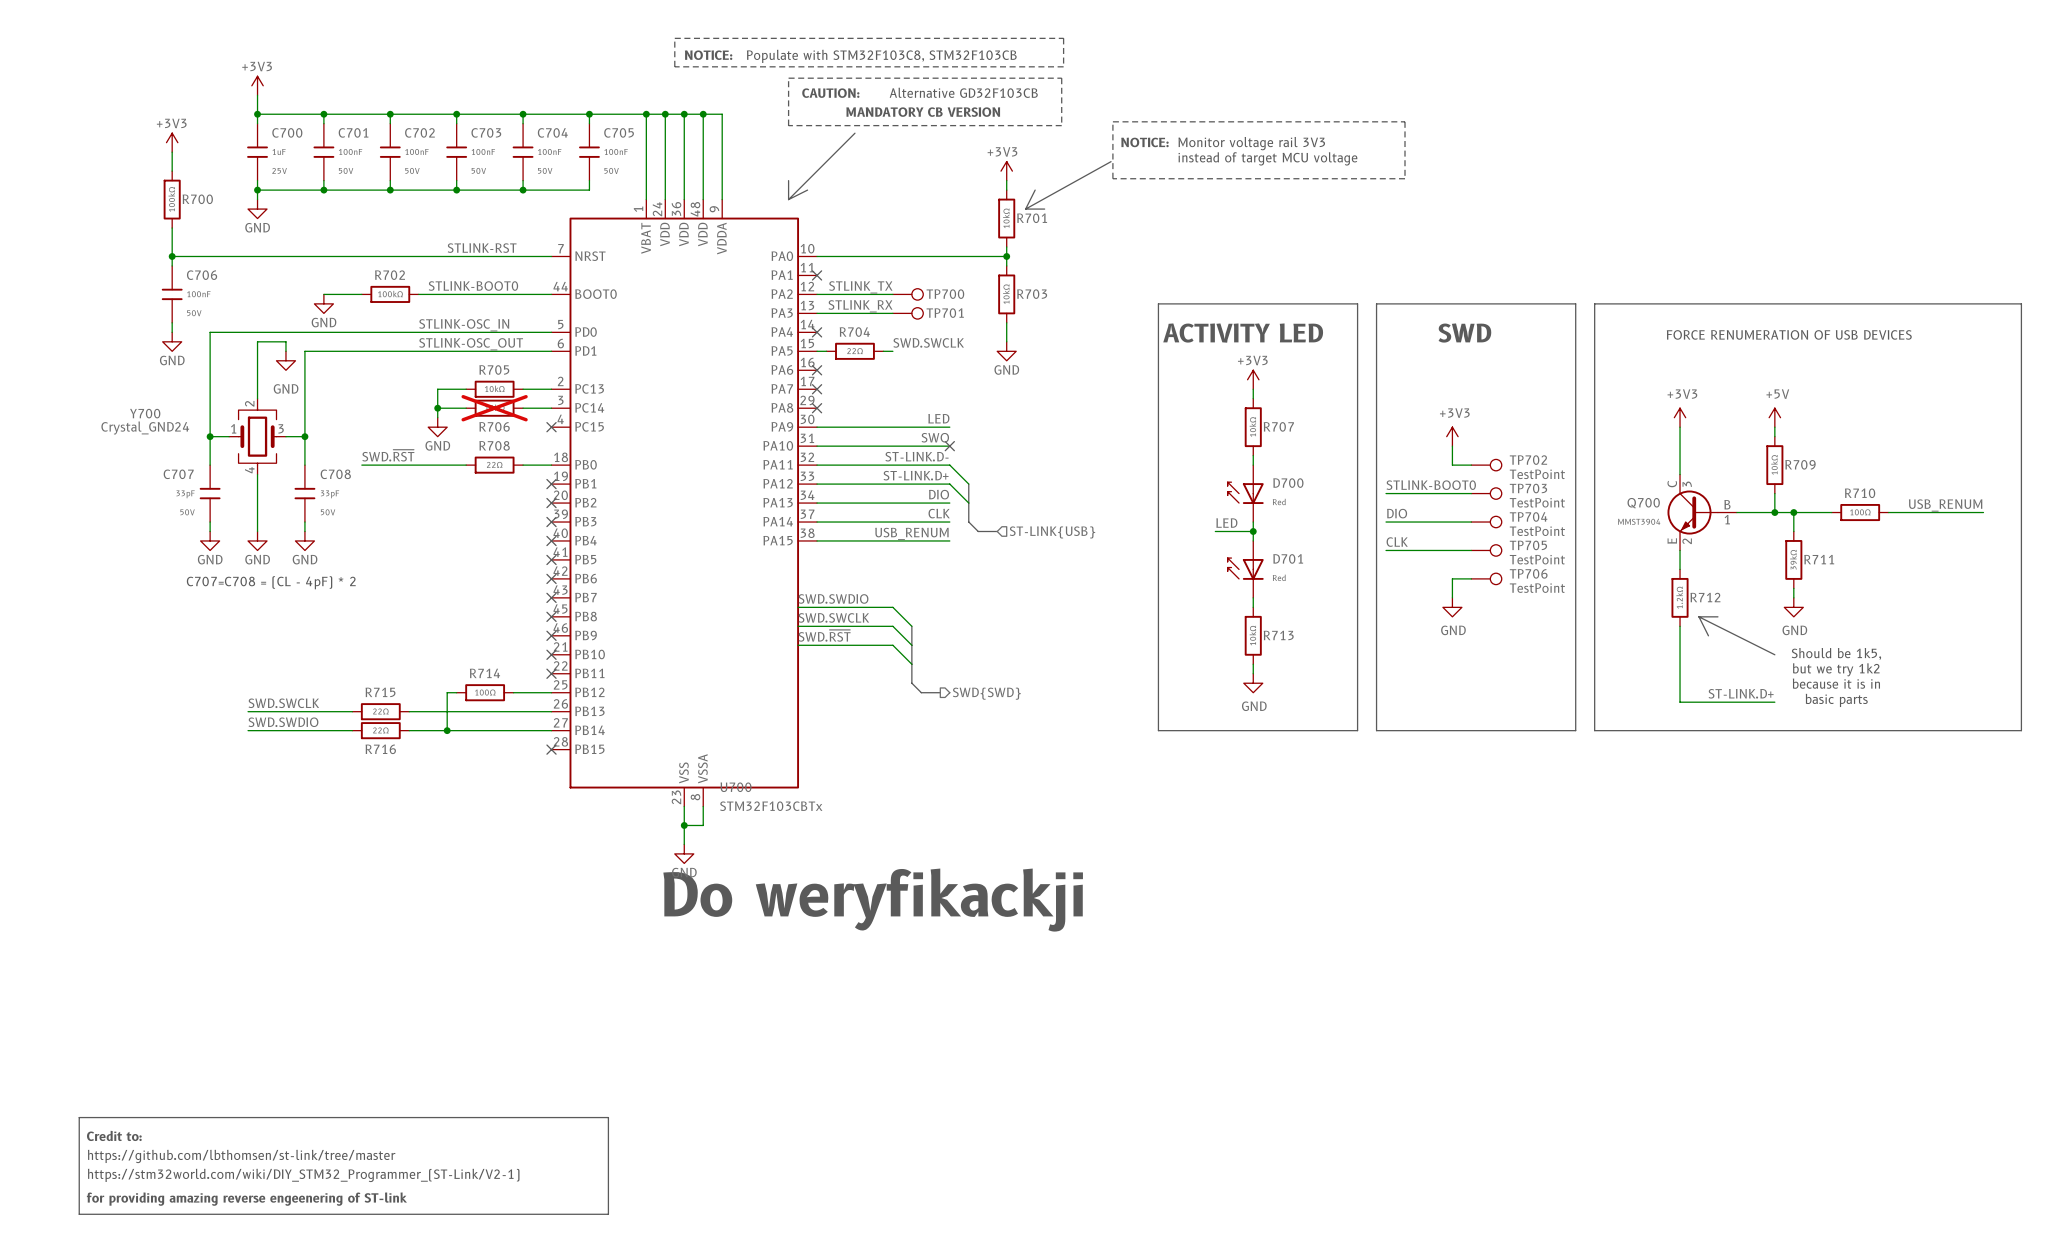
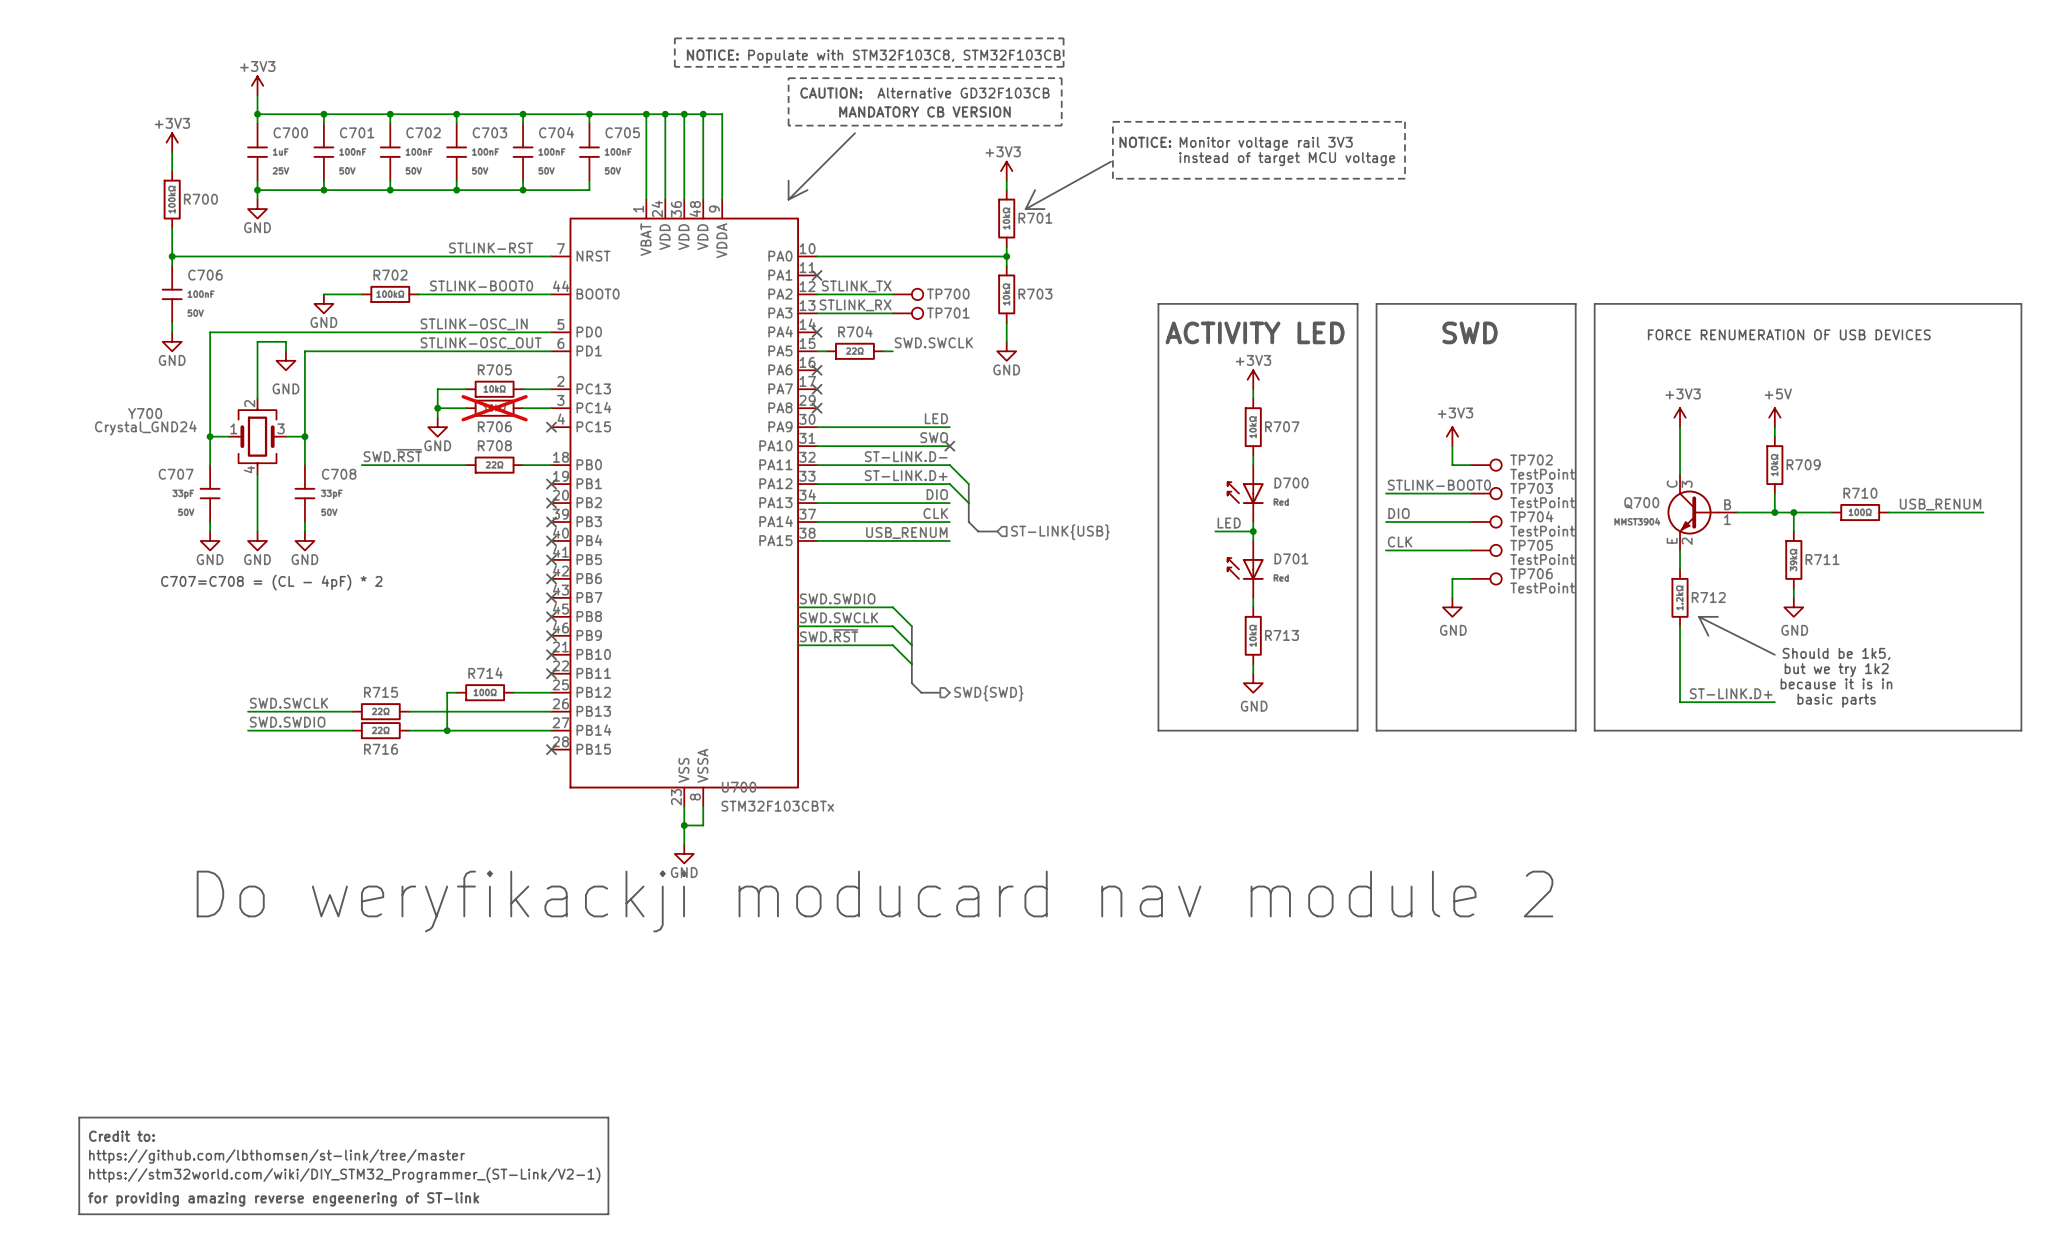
text: Do weryfikackji (873, 900) -> Do weryfikackji moducard nav module 2 (875, 901)

